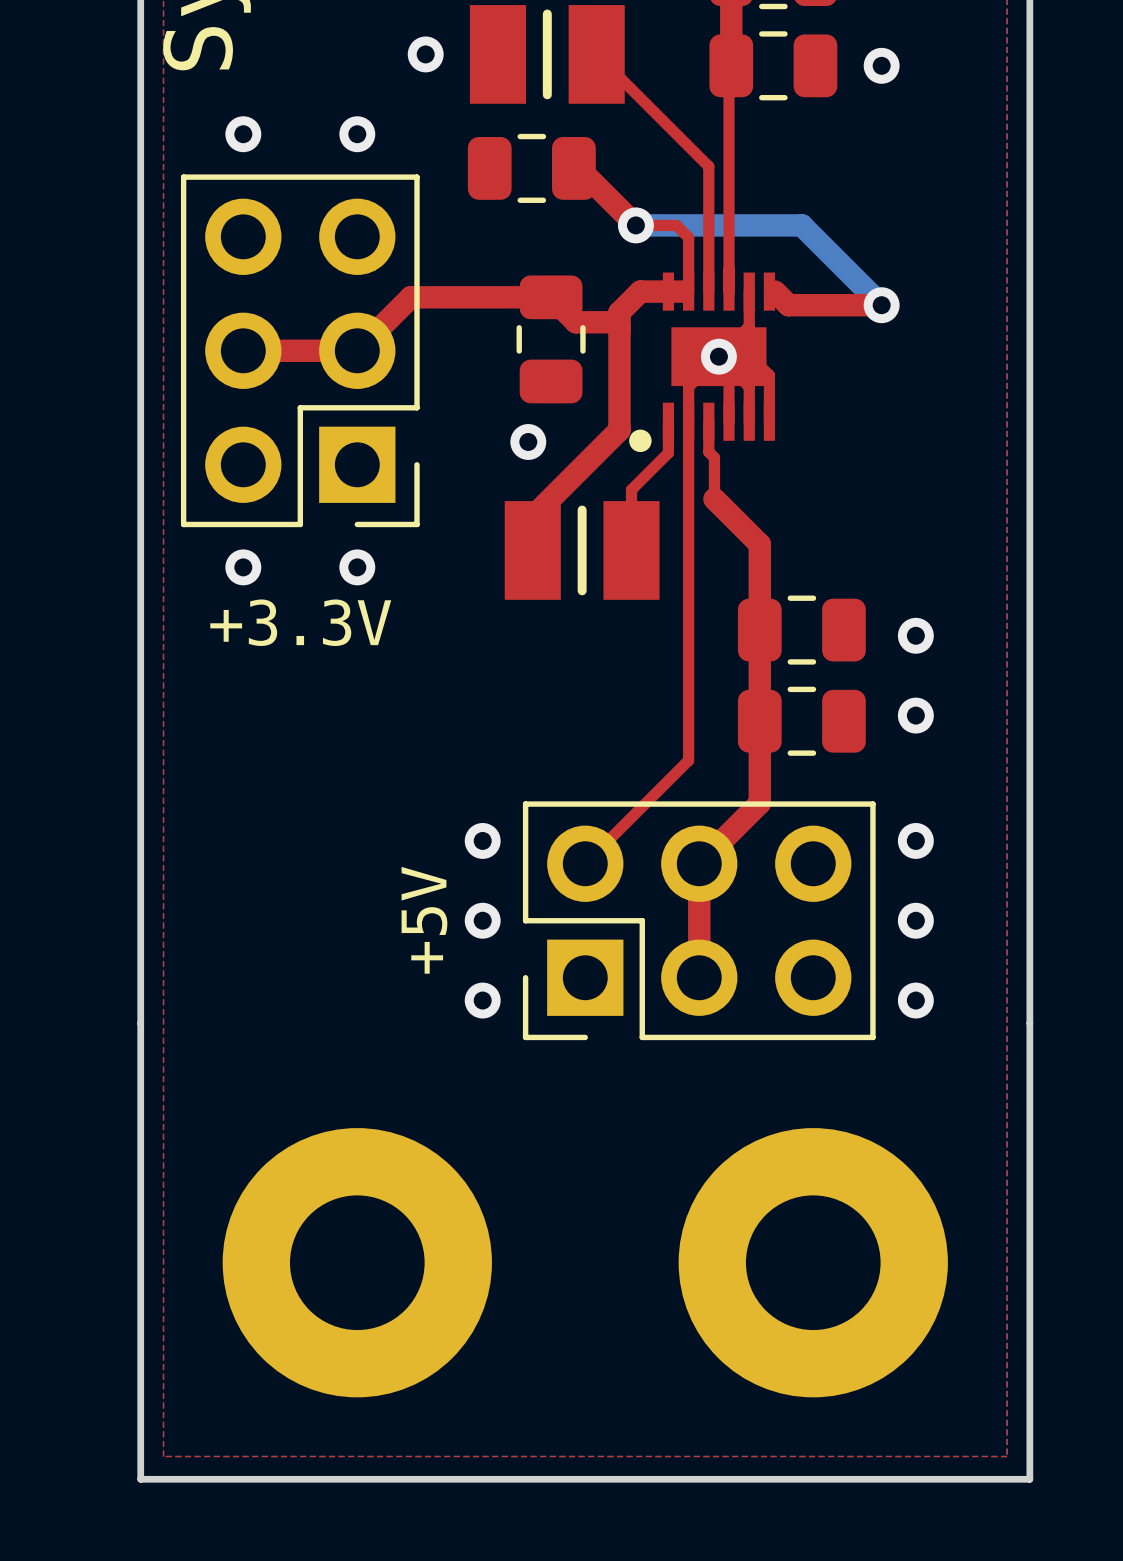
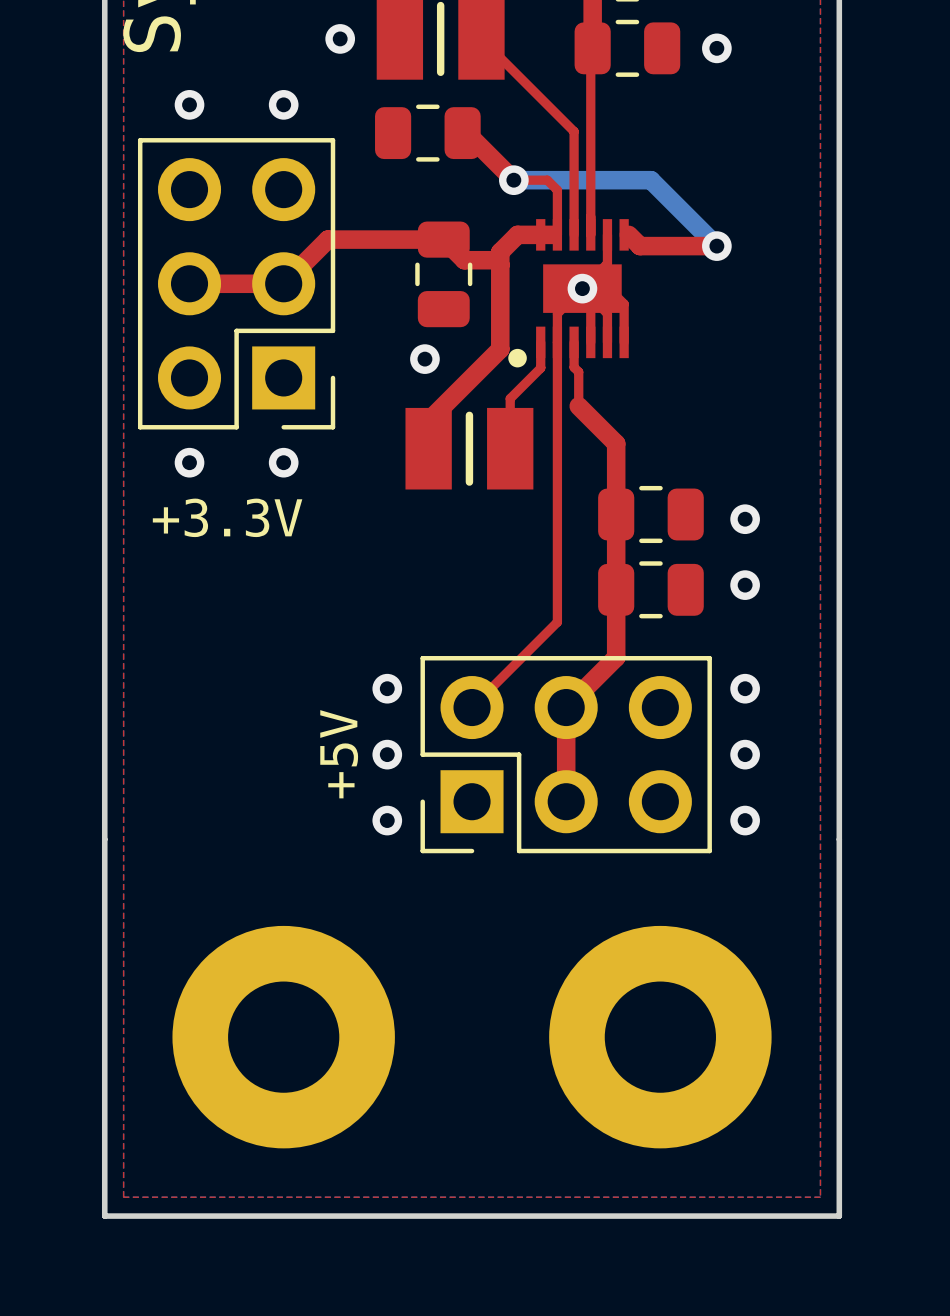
+3.3V name position: +3.3V (300, 622) -> +3.3V (227, 517)

